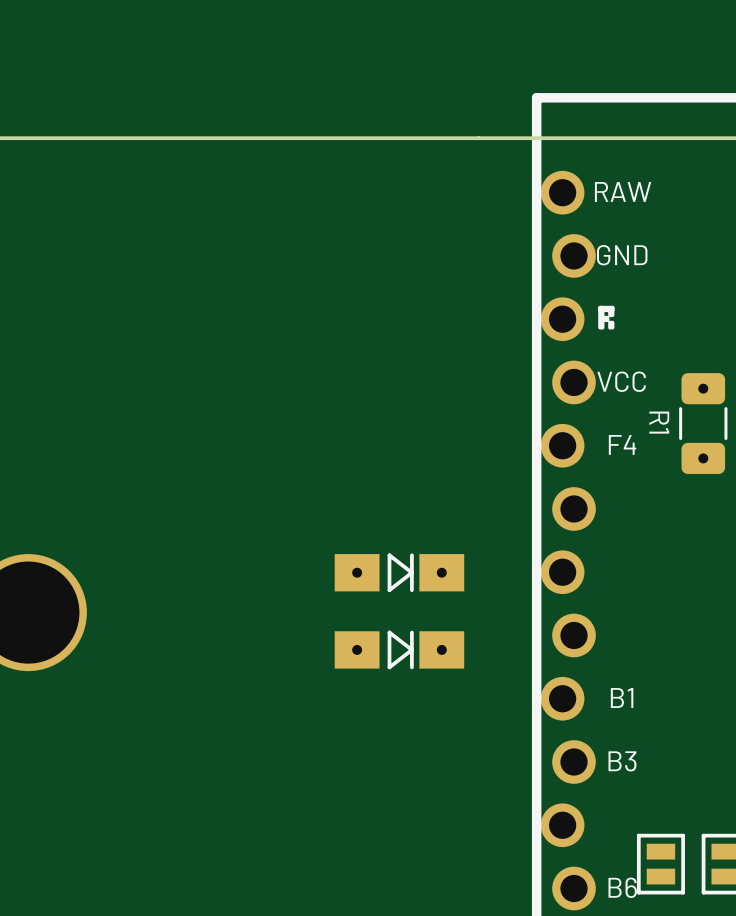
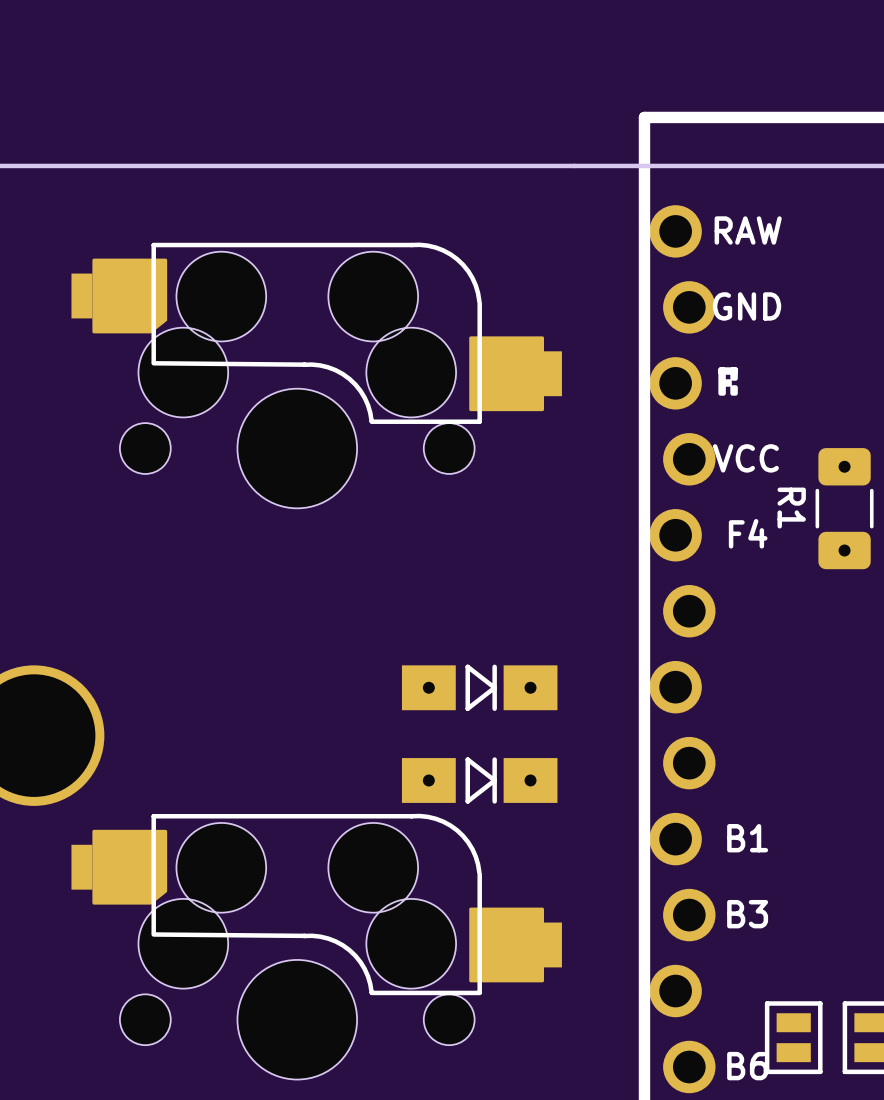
part: none -> (316, 375)
part: none -> (316, 946)

